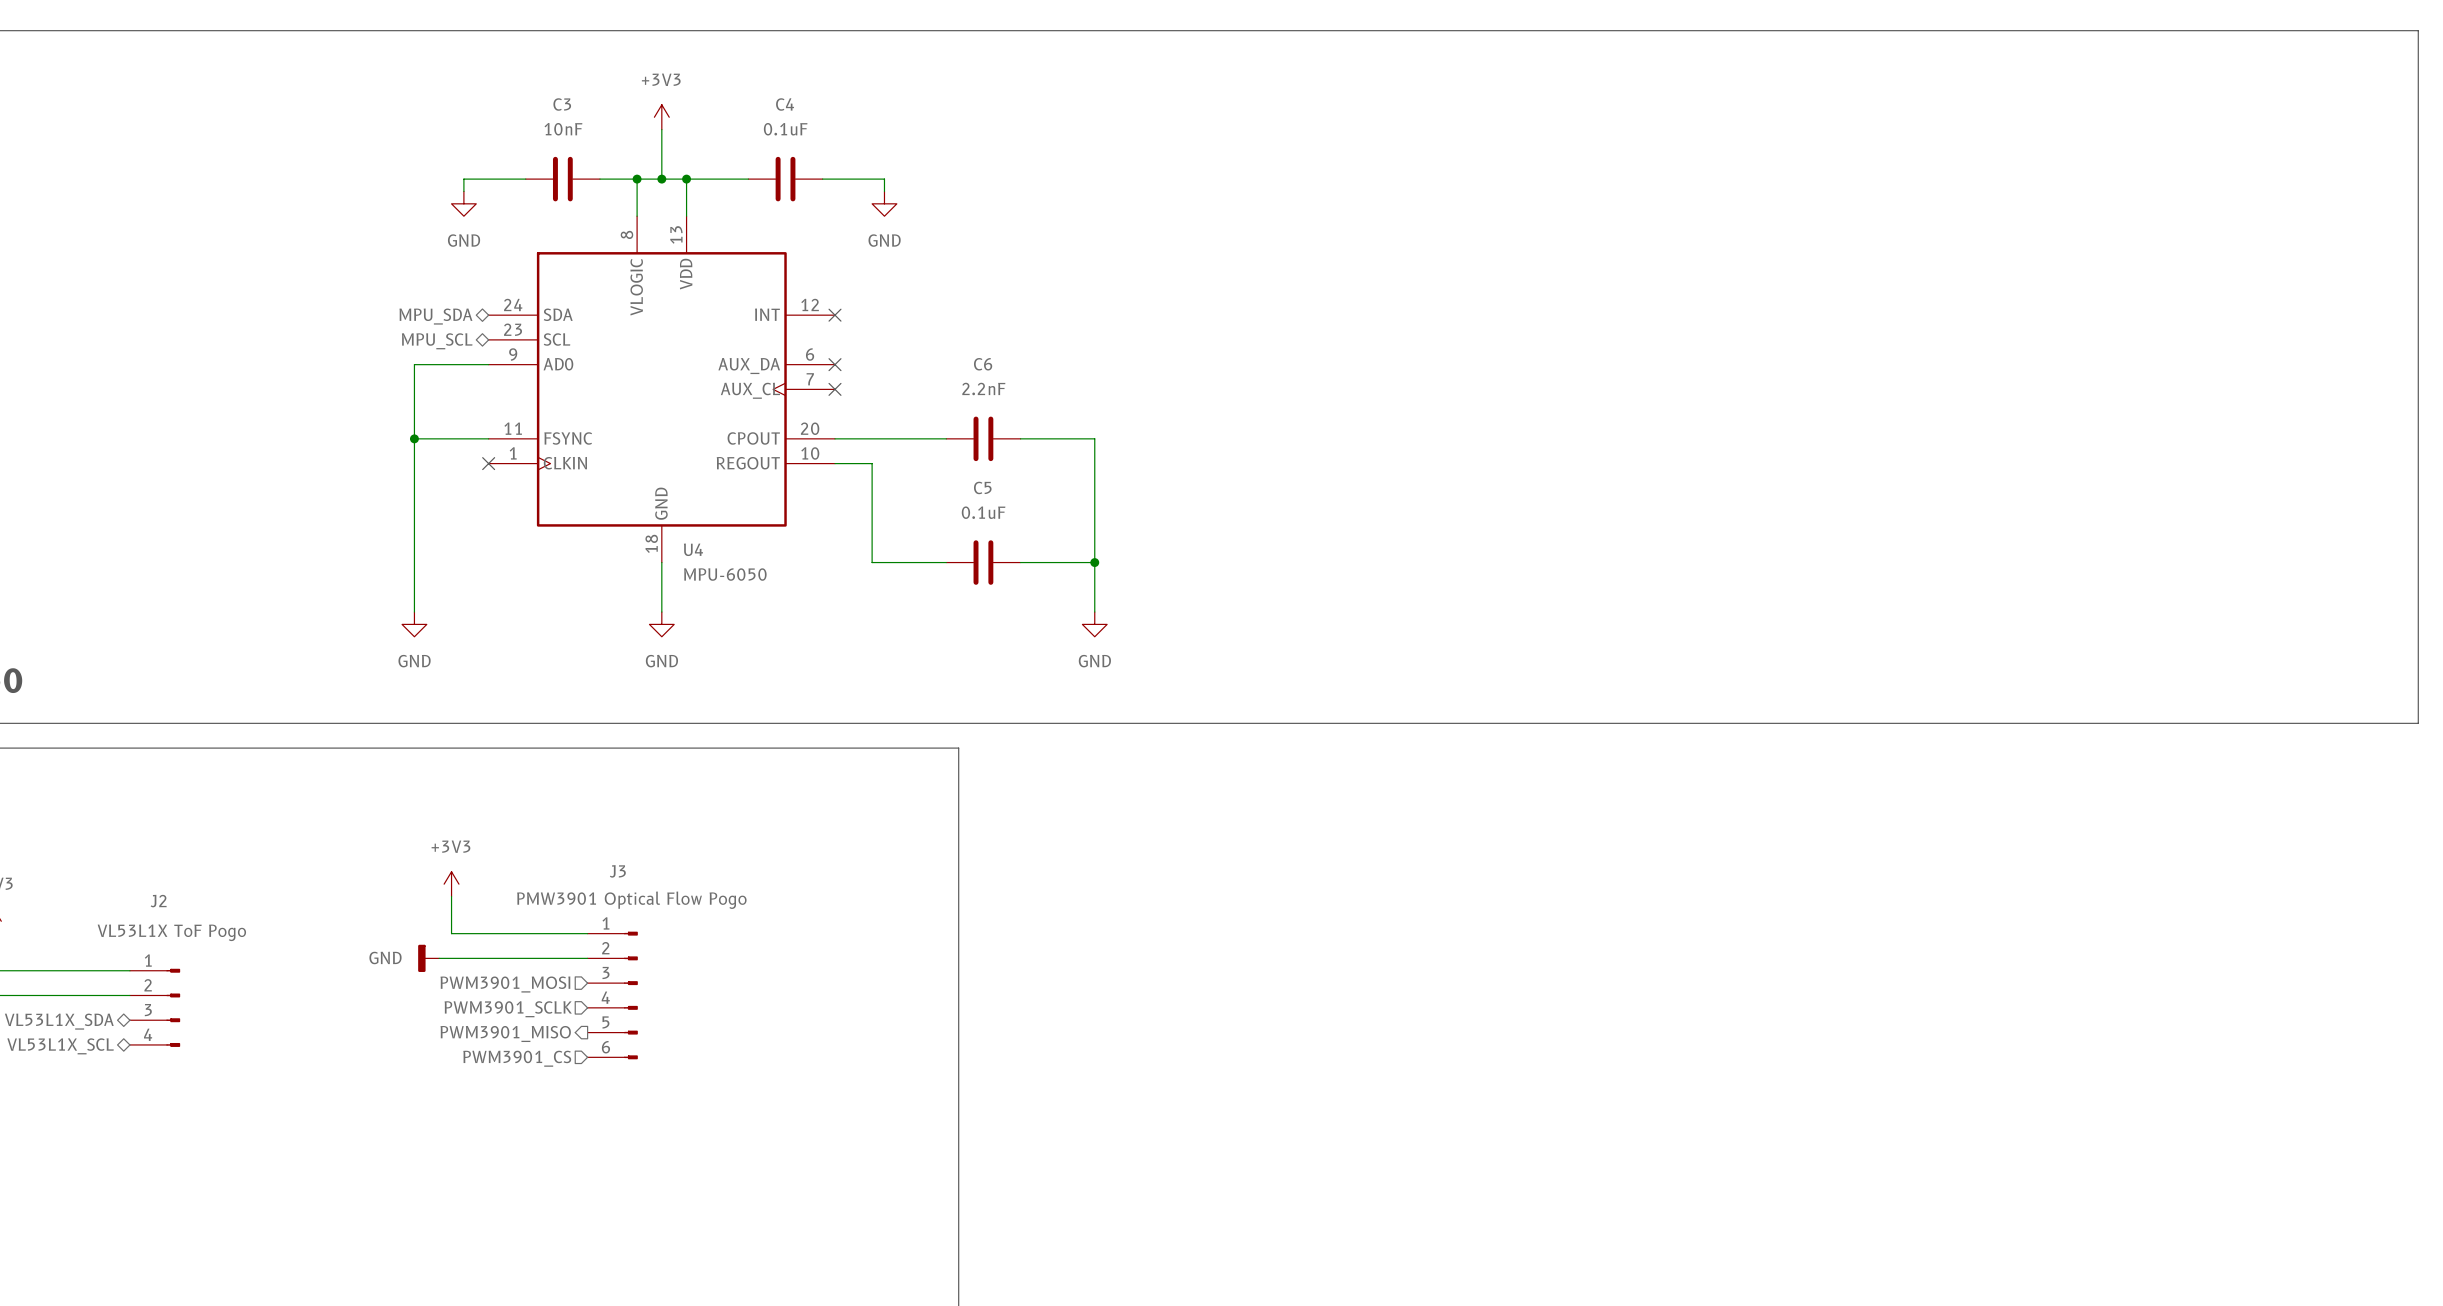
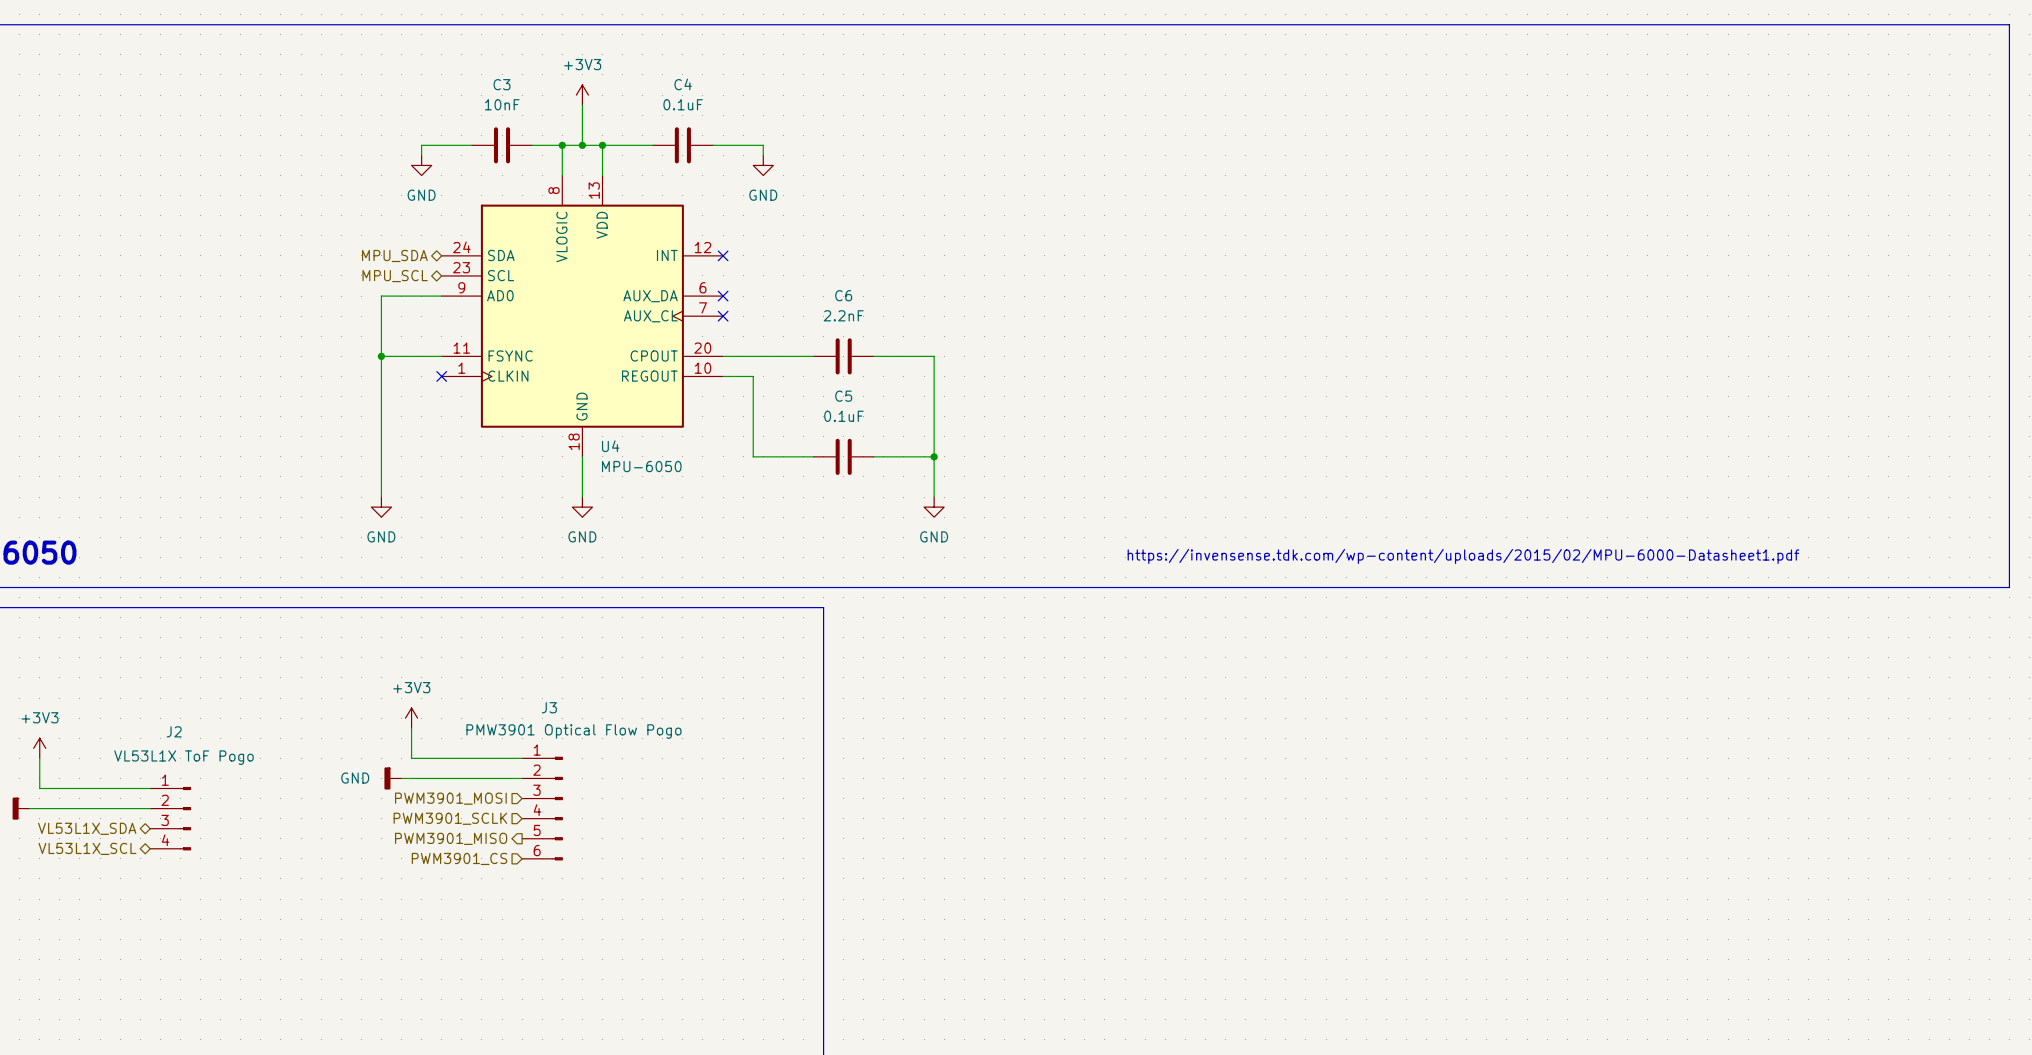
text: none -> https://invensense.tdk.com/wp-content/uploads/2015/02/MPU-6000-Datasheet1.pdf (1463, 556)

